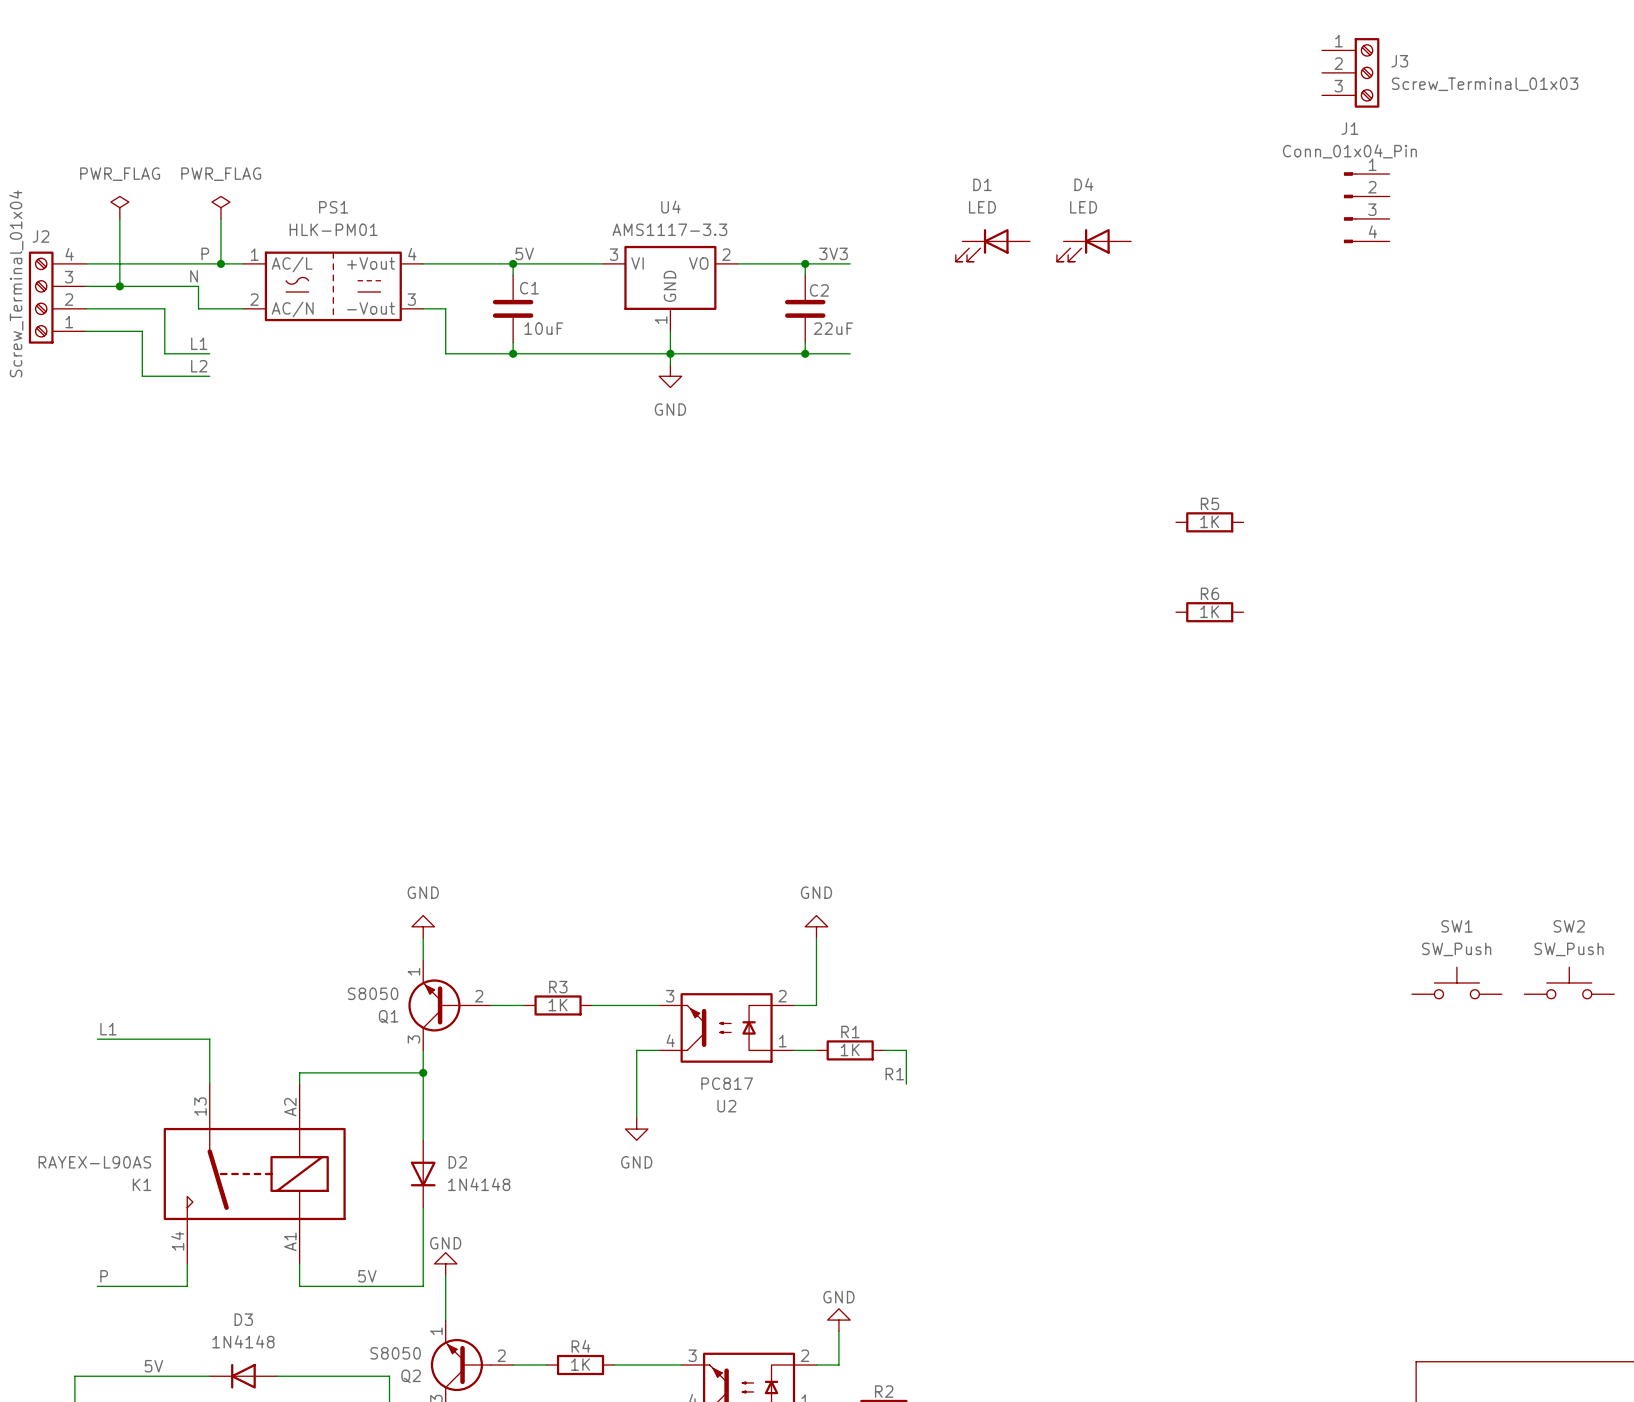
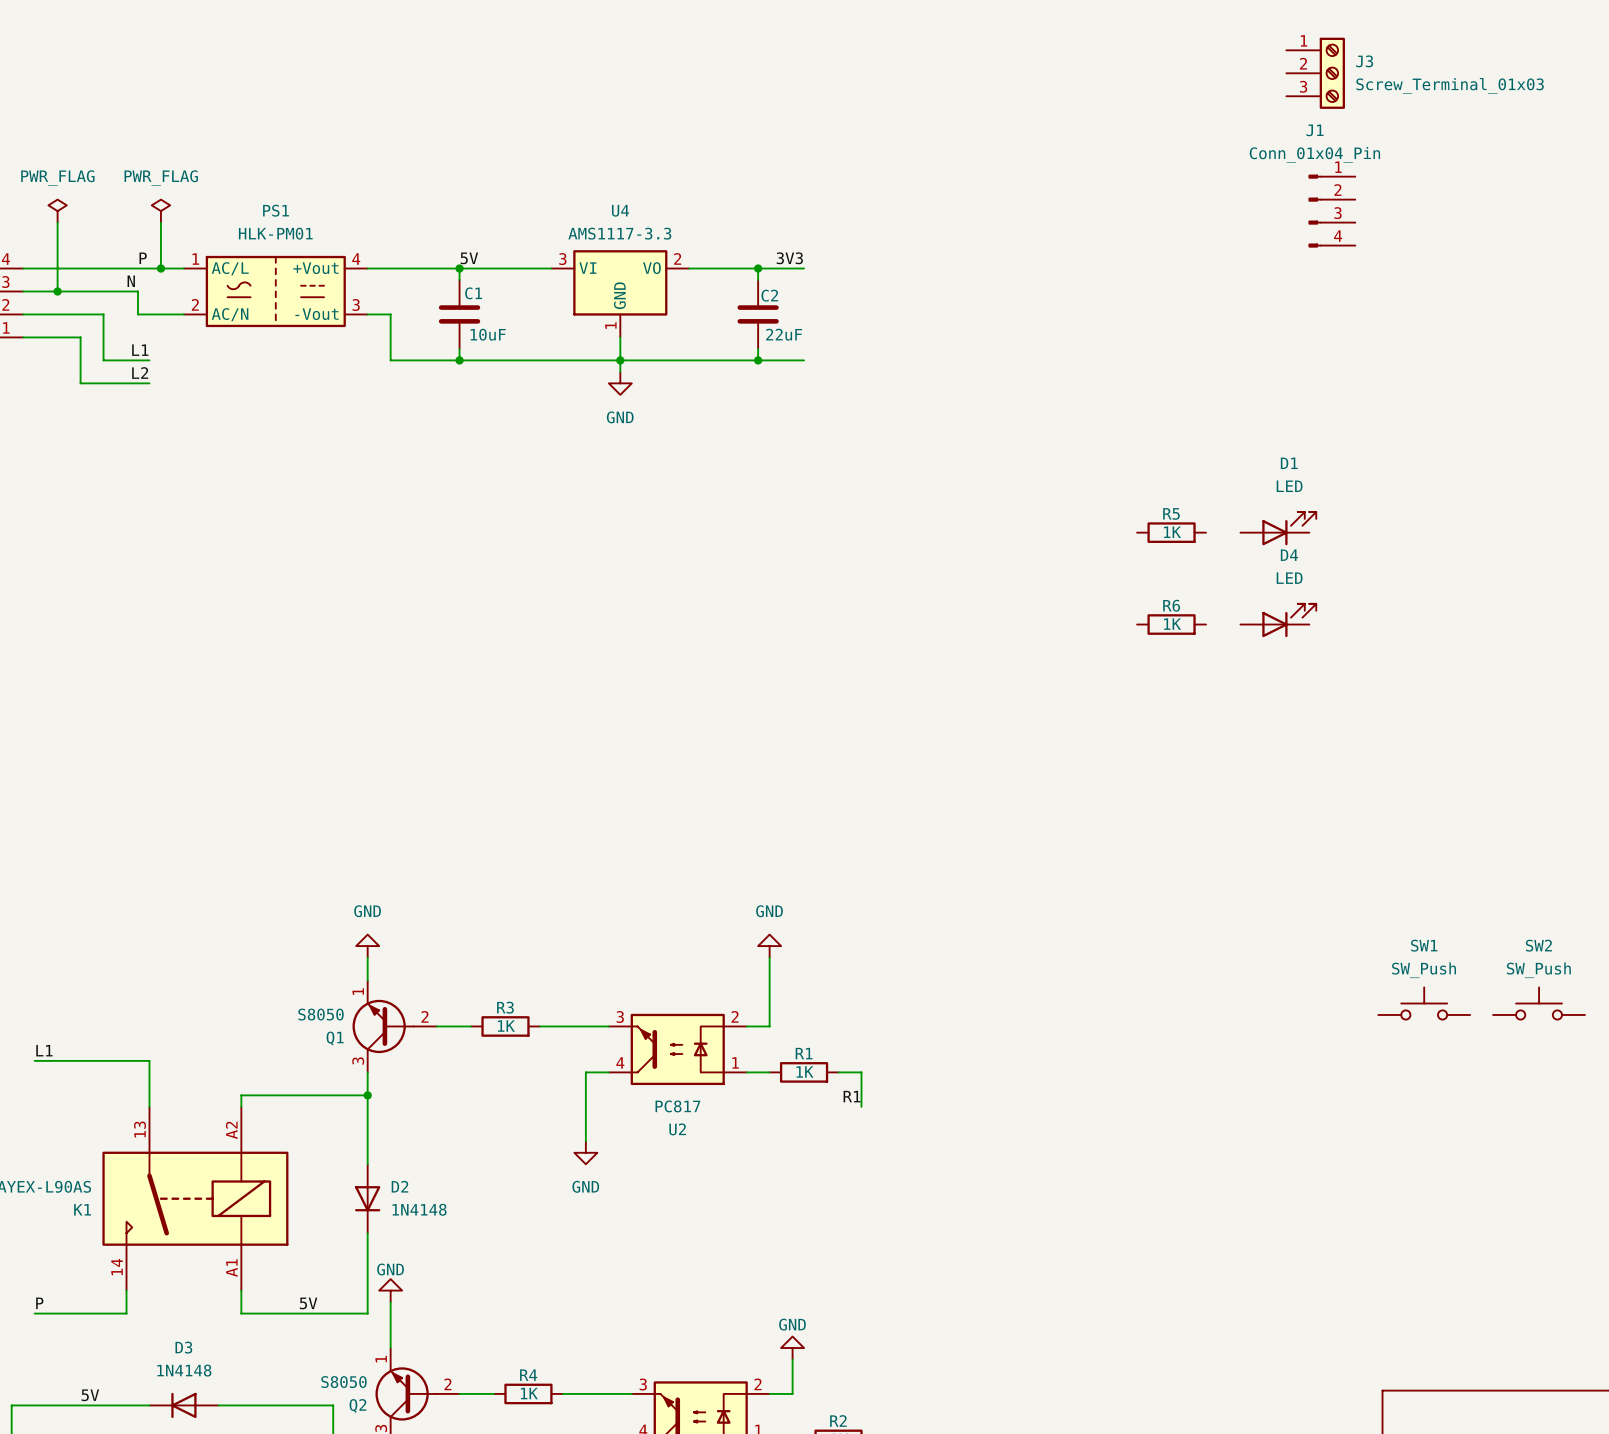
D1 name position: D1 (982, 184) -> D1 (1289, 463)
D4 name position: D4 (1083, 184) -> D4 (1289, 555)
D1 value position: LED (982, 207) -> LED (1289, 486)
D4 value position: LED (1083, 207) -> LED (1289, 578)
D1 rotation: 0° (982, 245) -> 180° (1289, 528)
D1 position: (992, 245) -> (1278, 528)
D4 rotation: 0° (1083, 245) -> 180° (1289, 620)
D4 position: (1094, 245) -> (1278, 620)

